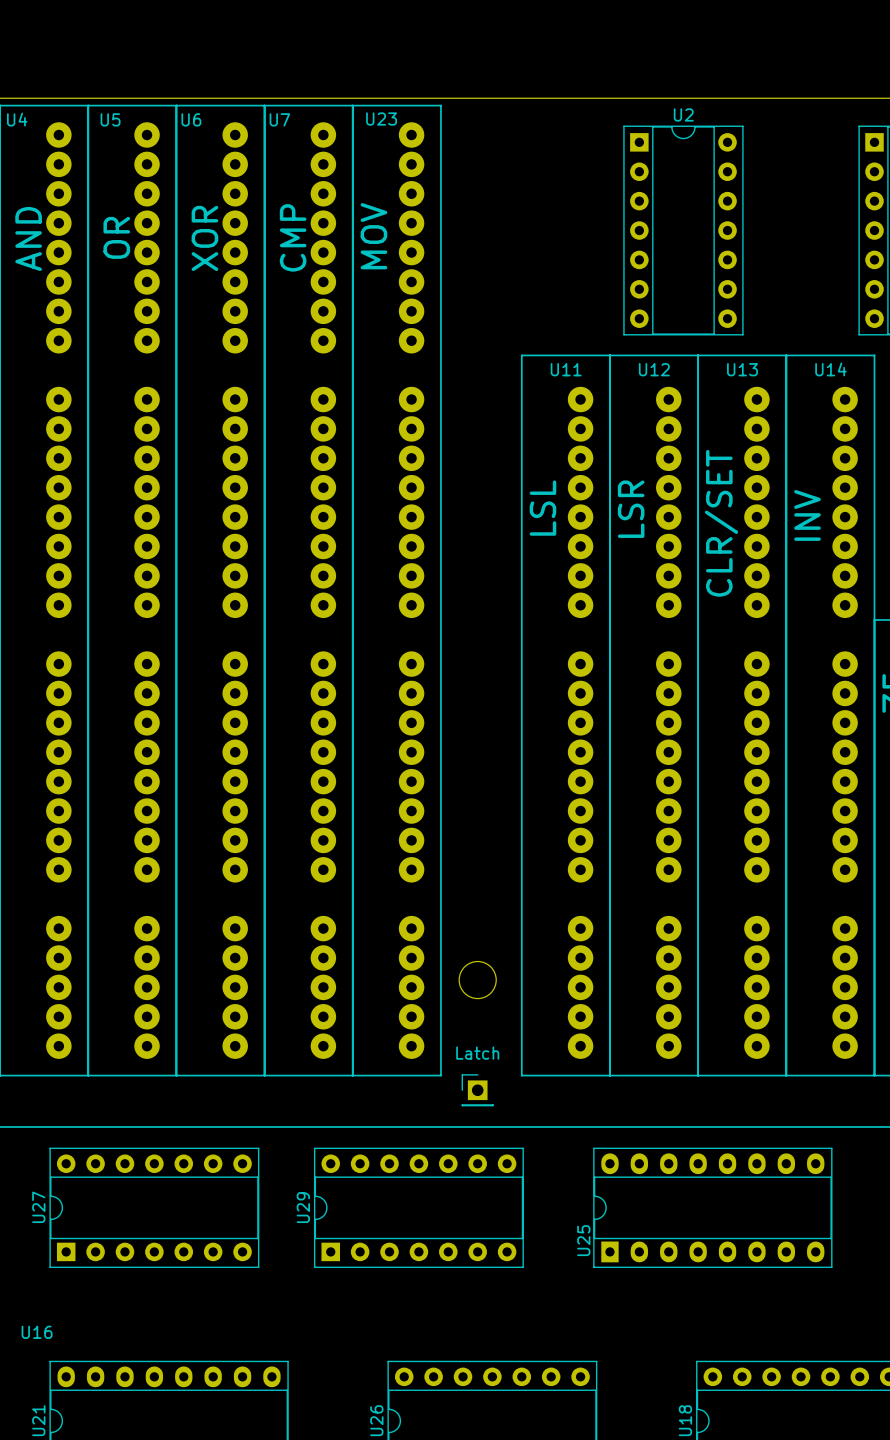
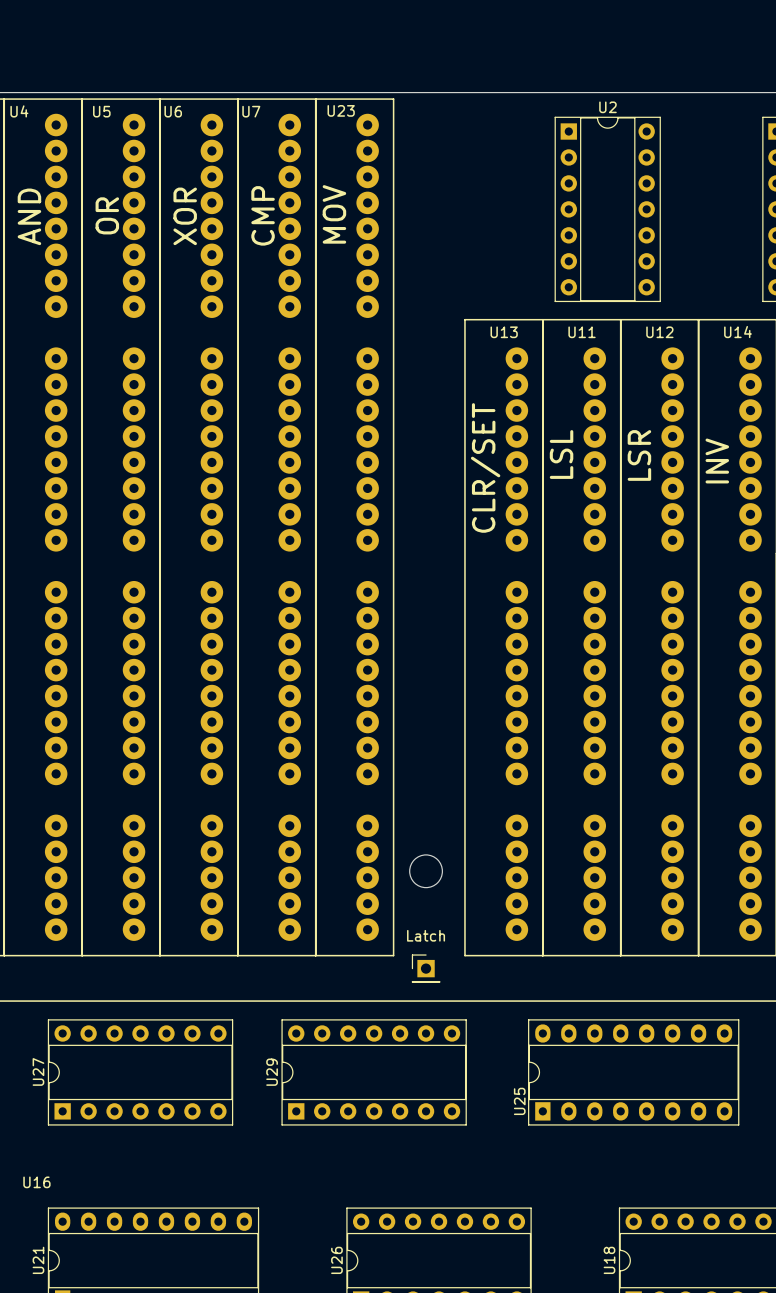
U11 name: U11 (566, 369) -> U13 (504, 332)
U12 name: U12 (654, 369) -> U11 (582, 332)
U13 name: U13 (742, 369) -> U12 (659, 332)
text: LSL (542, 508) -> none
text: LSR (631, 509) -> LSL (561, 454)
text: none -> LSR (639, 455)
text position: CLR/SET (721, 523) -> CLR/SET (485, 467)

